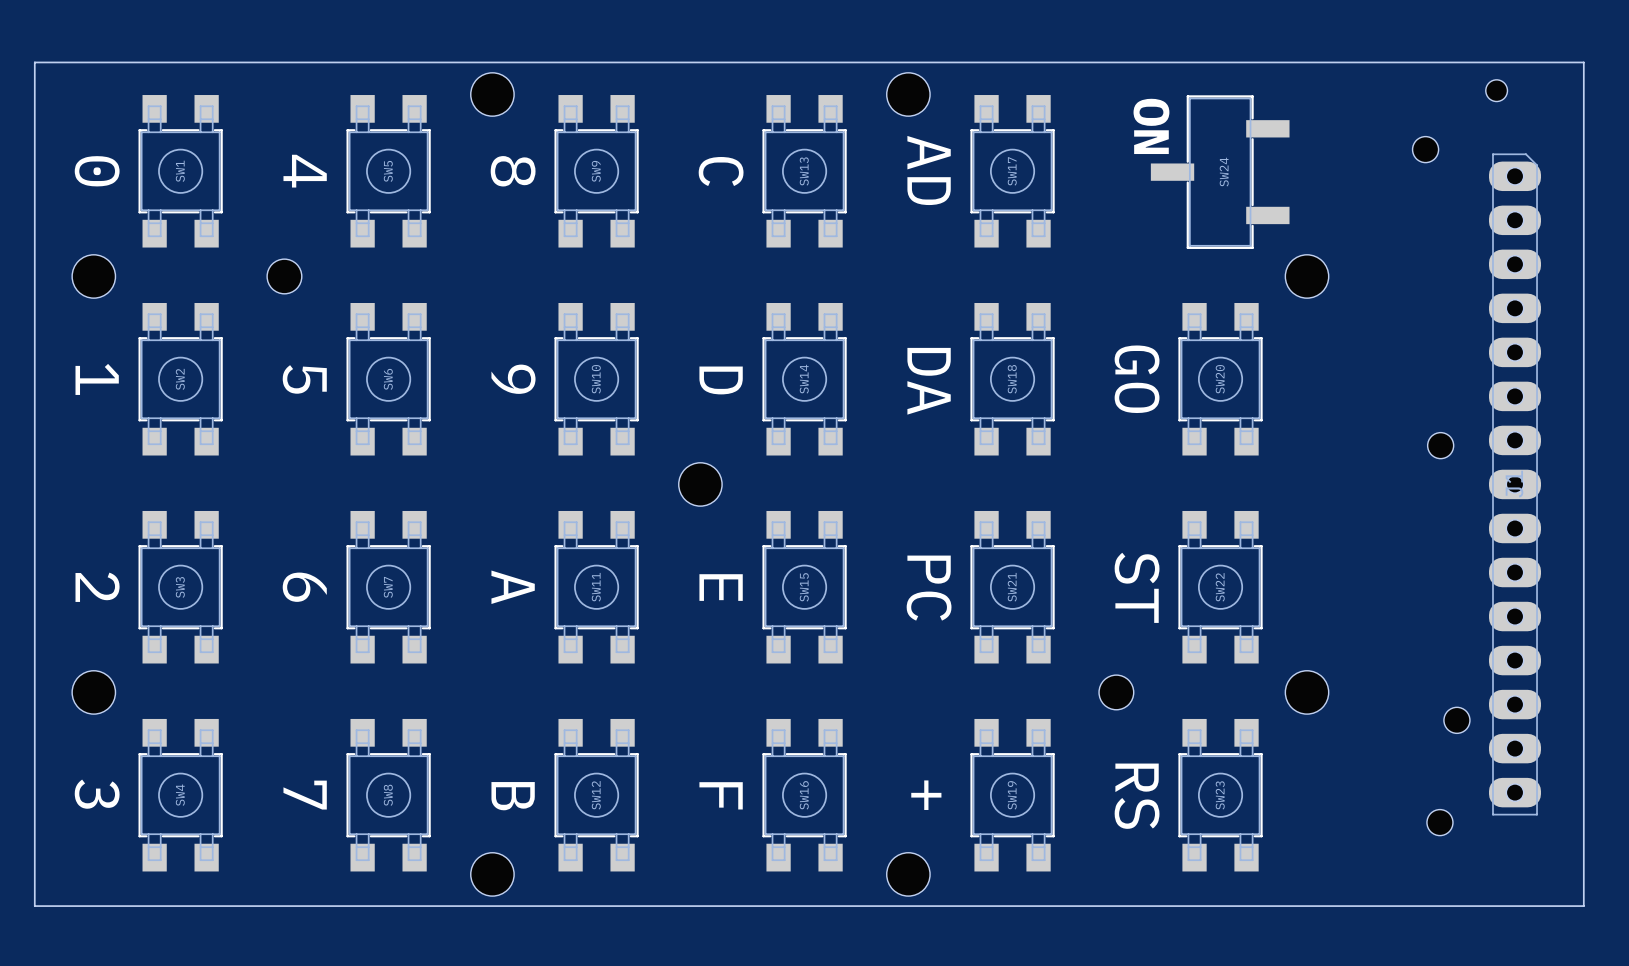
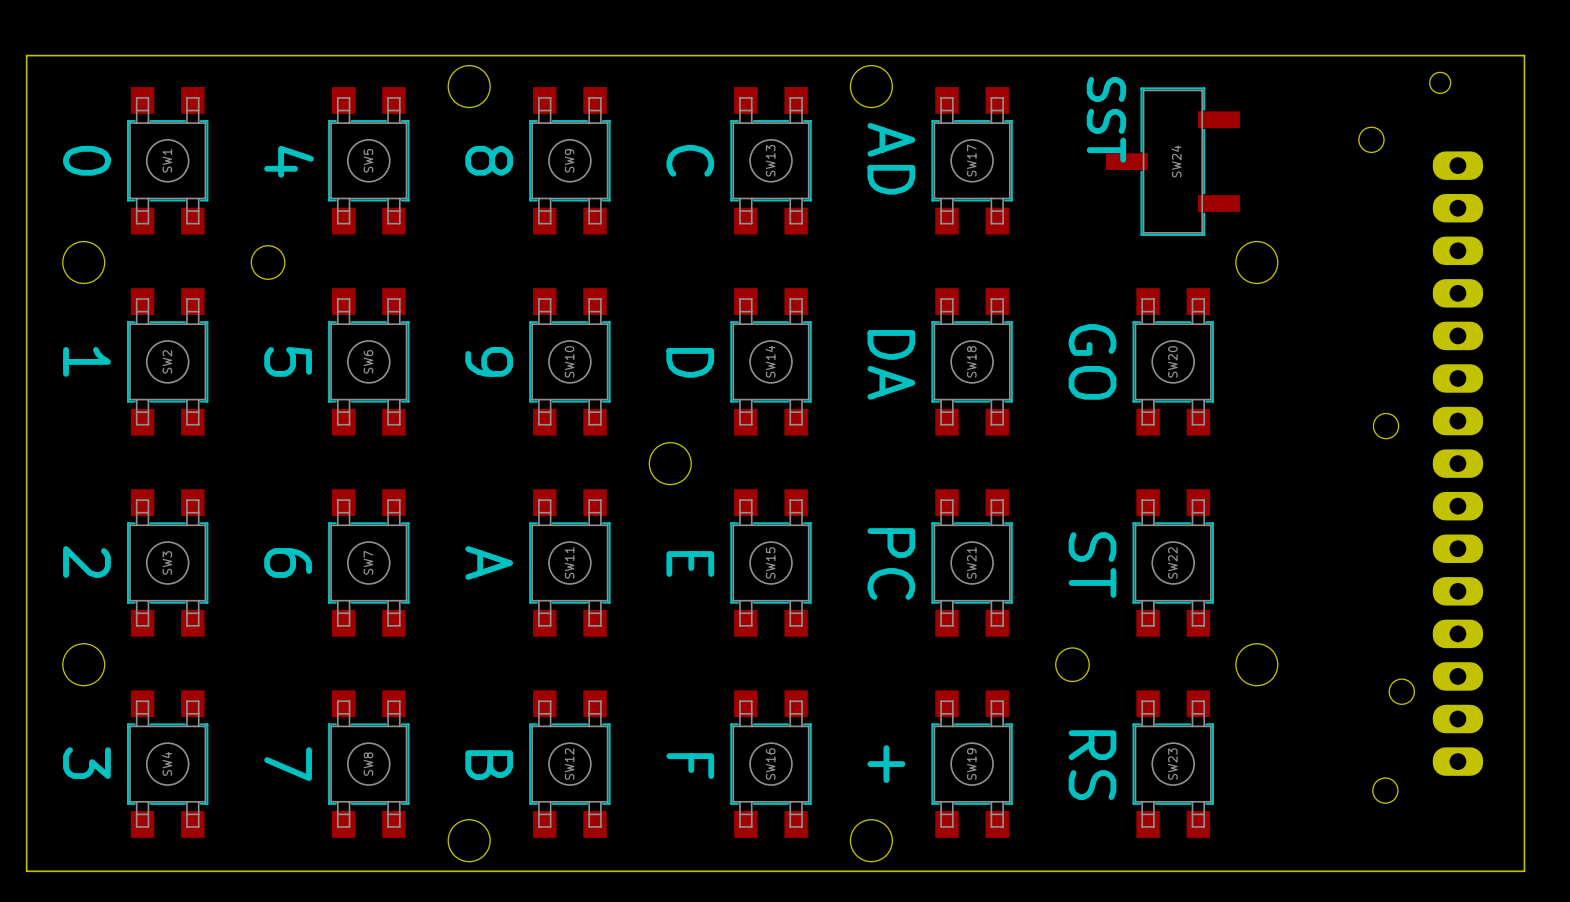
SW24 value: ON (1151, 126) -> SST (1106, 119)
part side: top (1515, 484) -> bottom (1457, 463)

